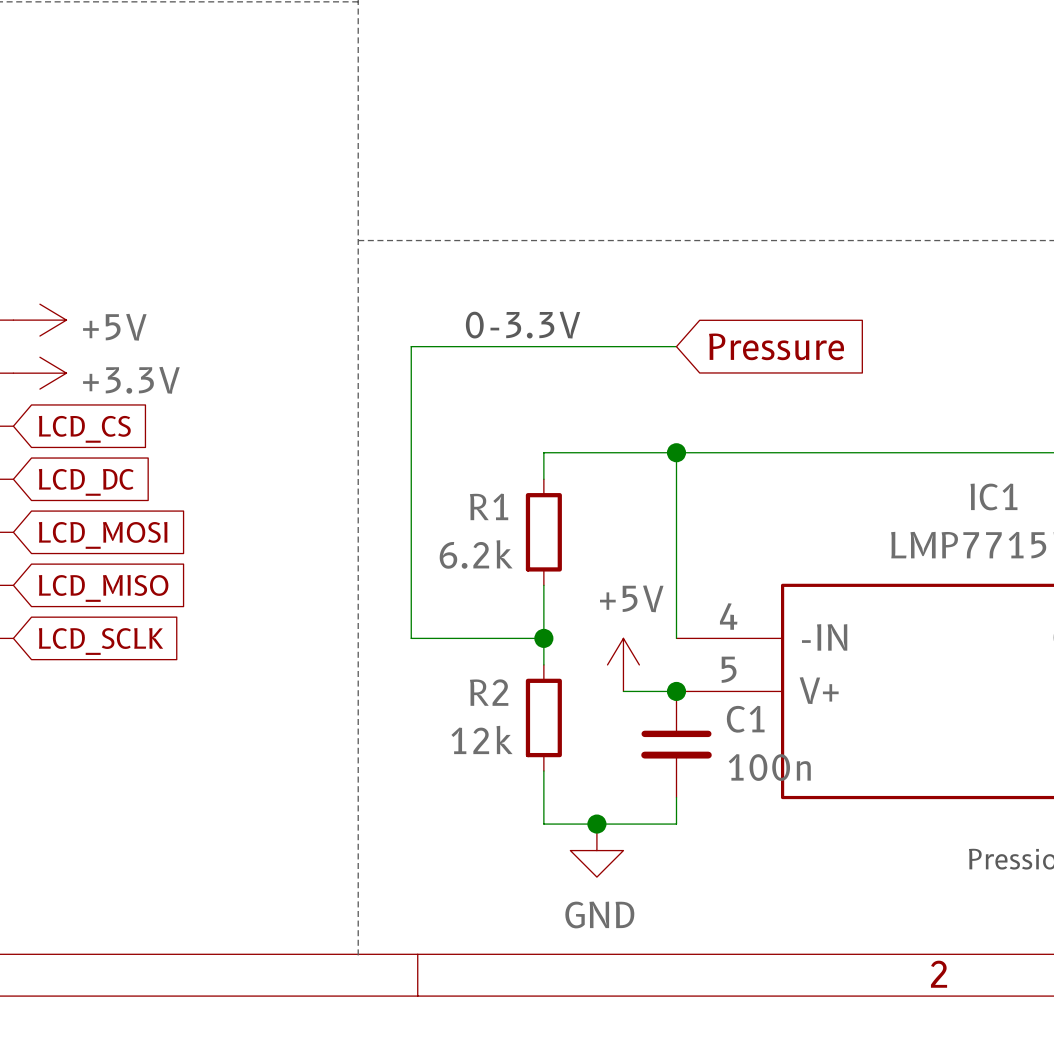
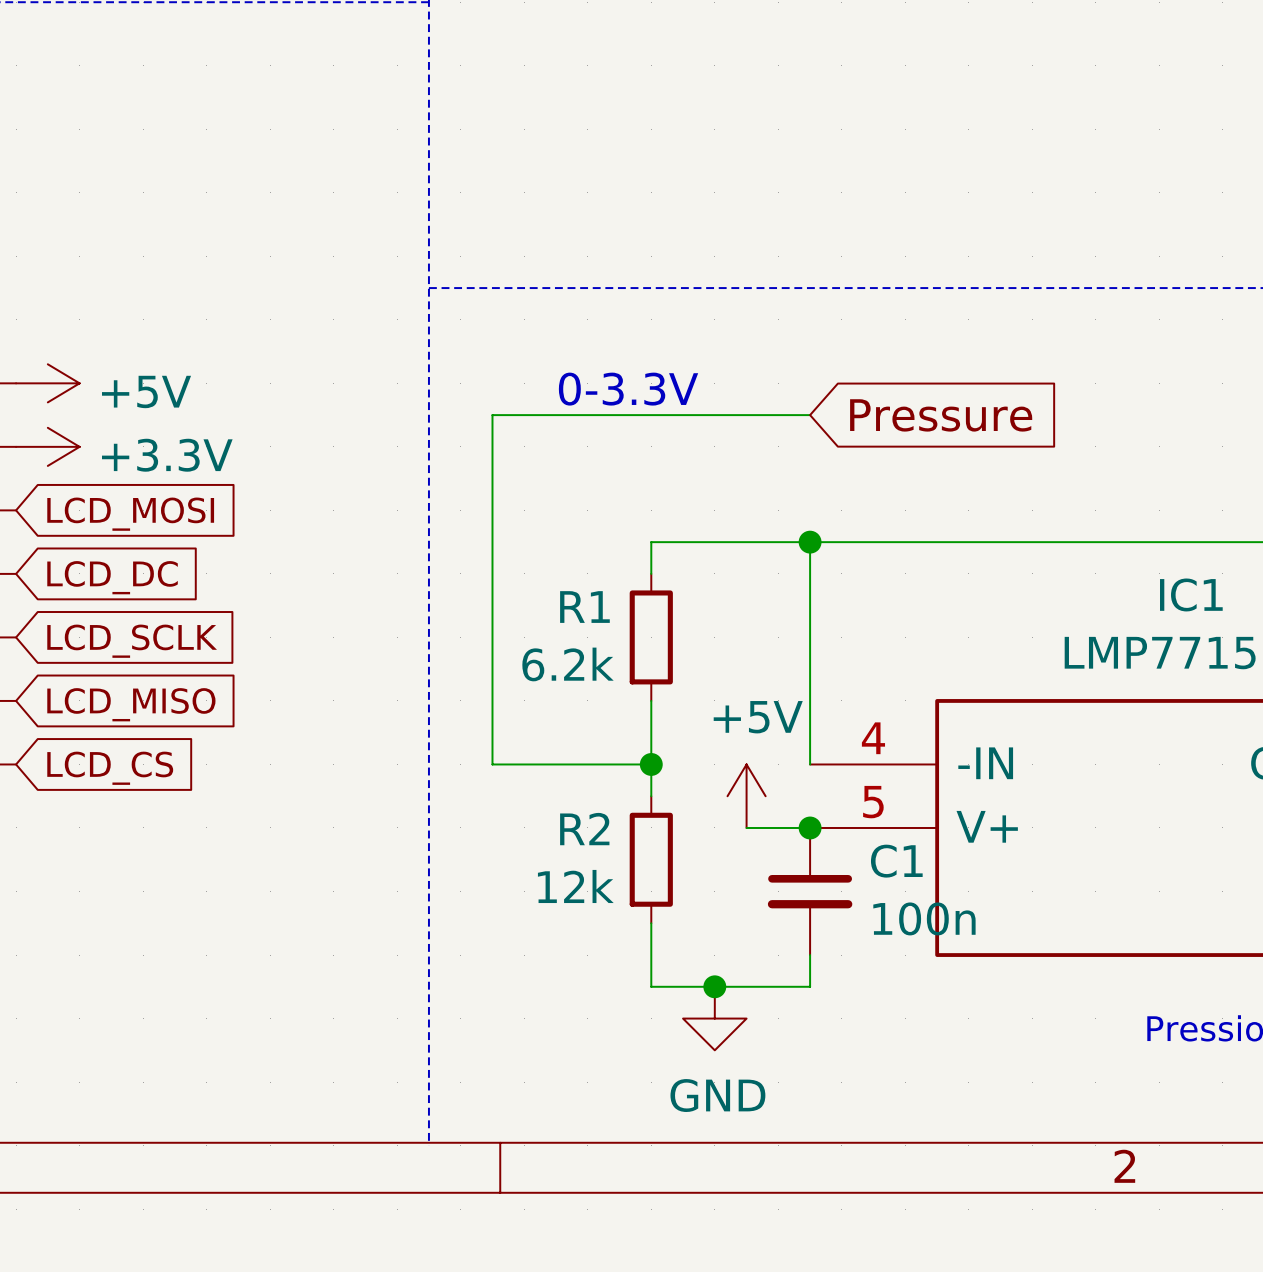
global label: LCD_CS (84, 429) -> LCD_MOSI (130, 514)
global label: LCD_MOSI (103, 535) -> LCD_SCLK (132, 641)
global label: LCD_SCLK (101, 641) -> LCD_CS (110, 768)

